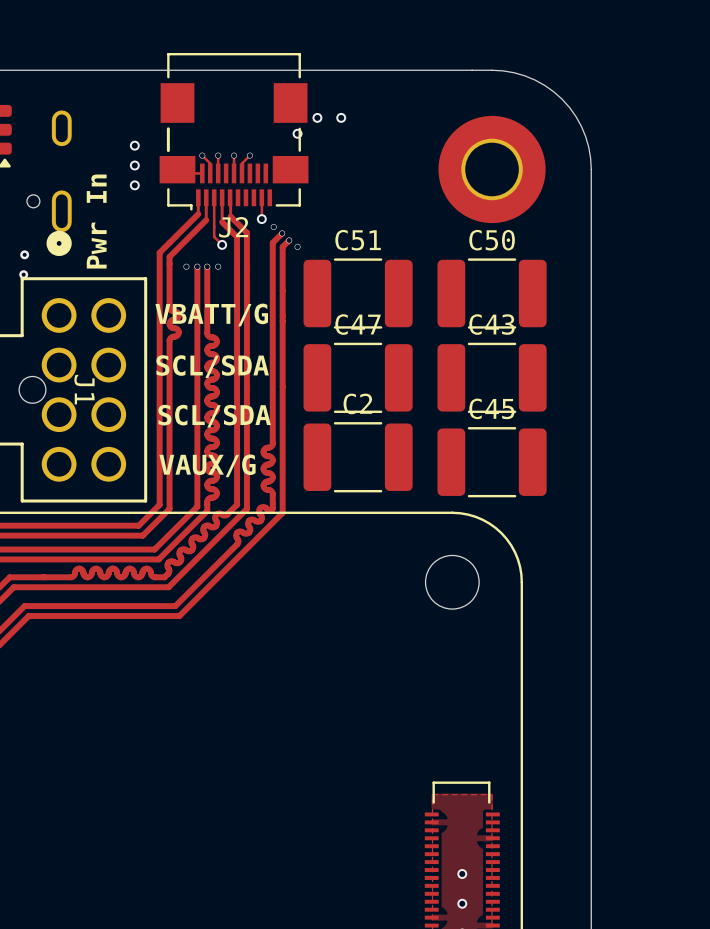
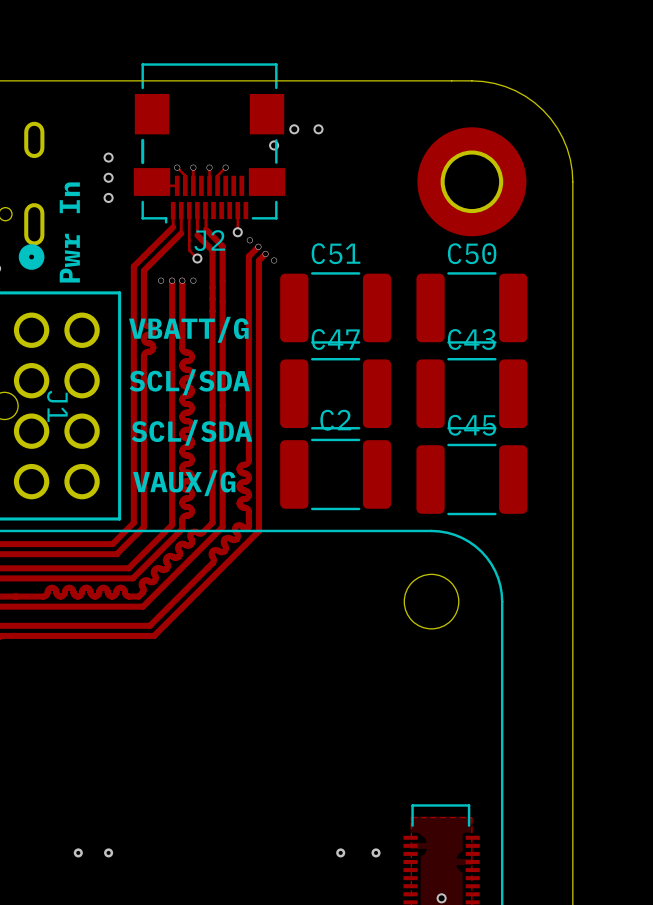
via: none -> (78, 852)
via: none -> (108, 852)
via: none -> (340, 852)
via: none -> (376, 852)

